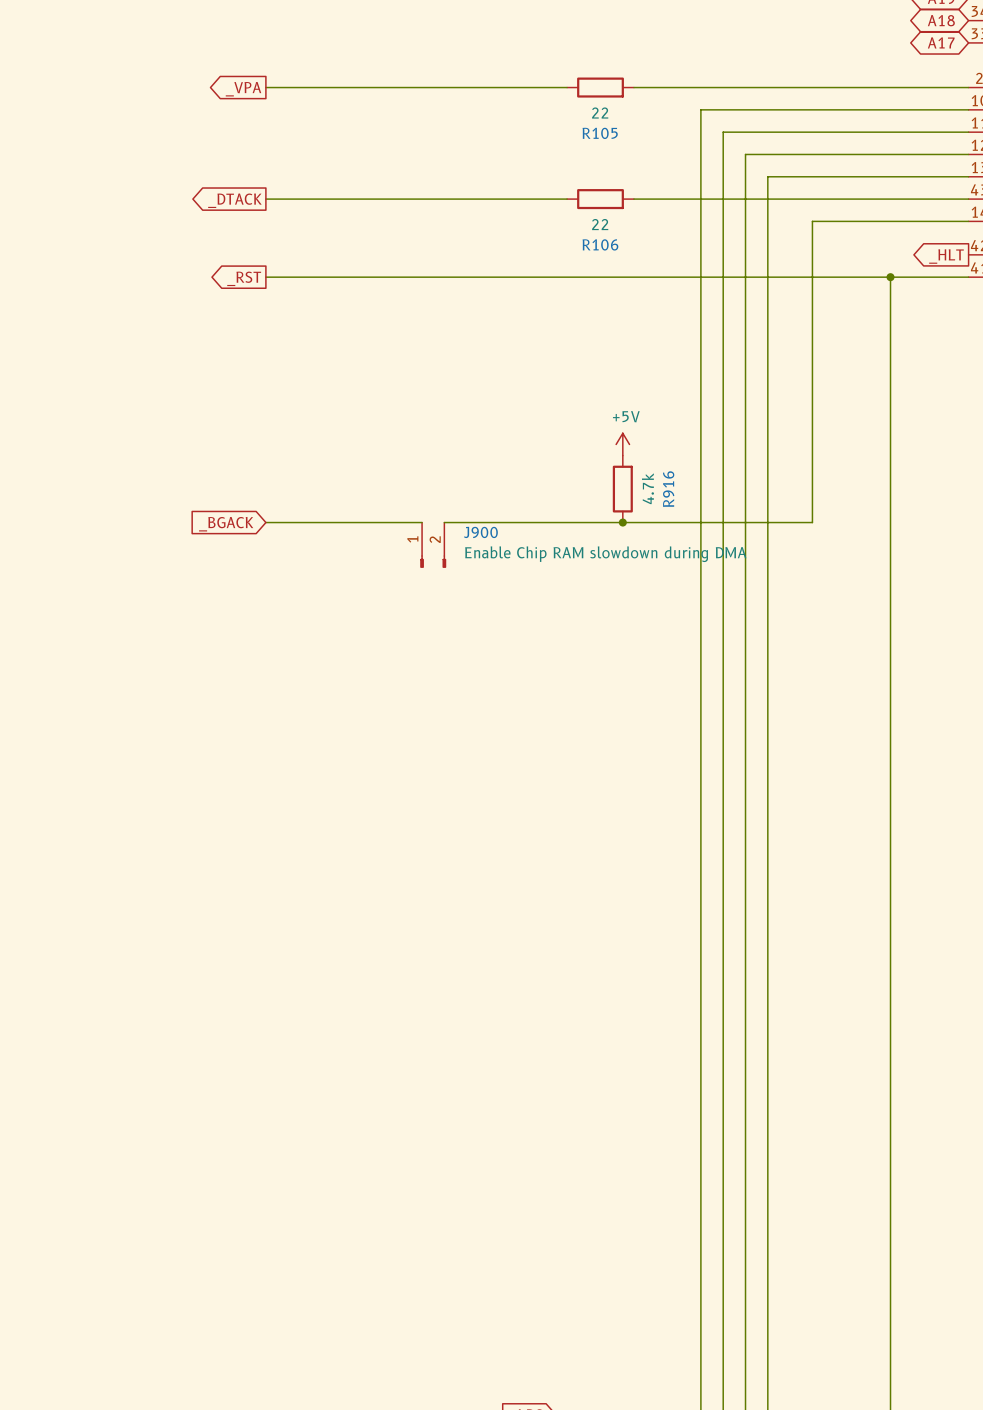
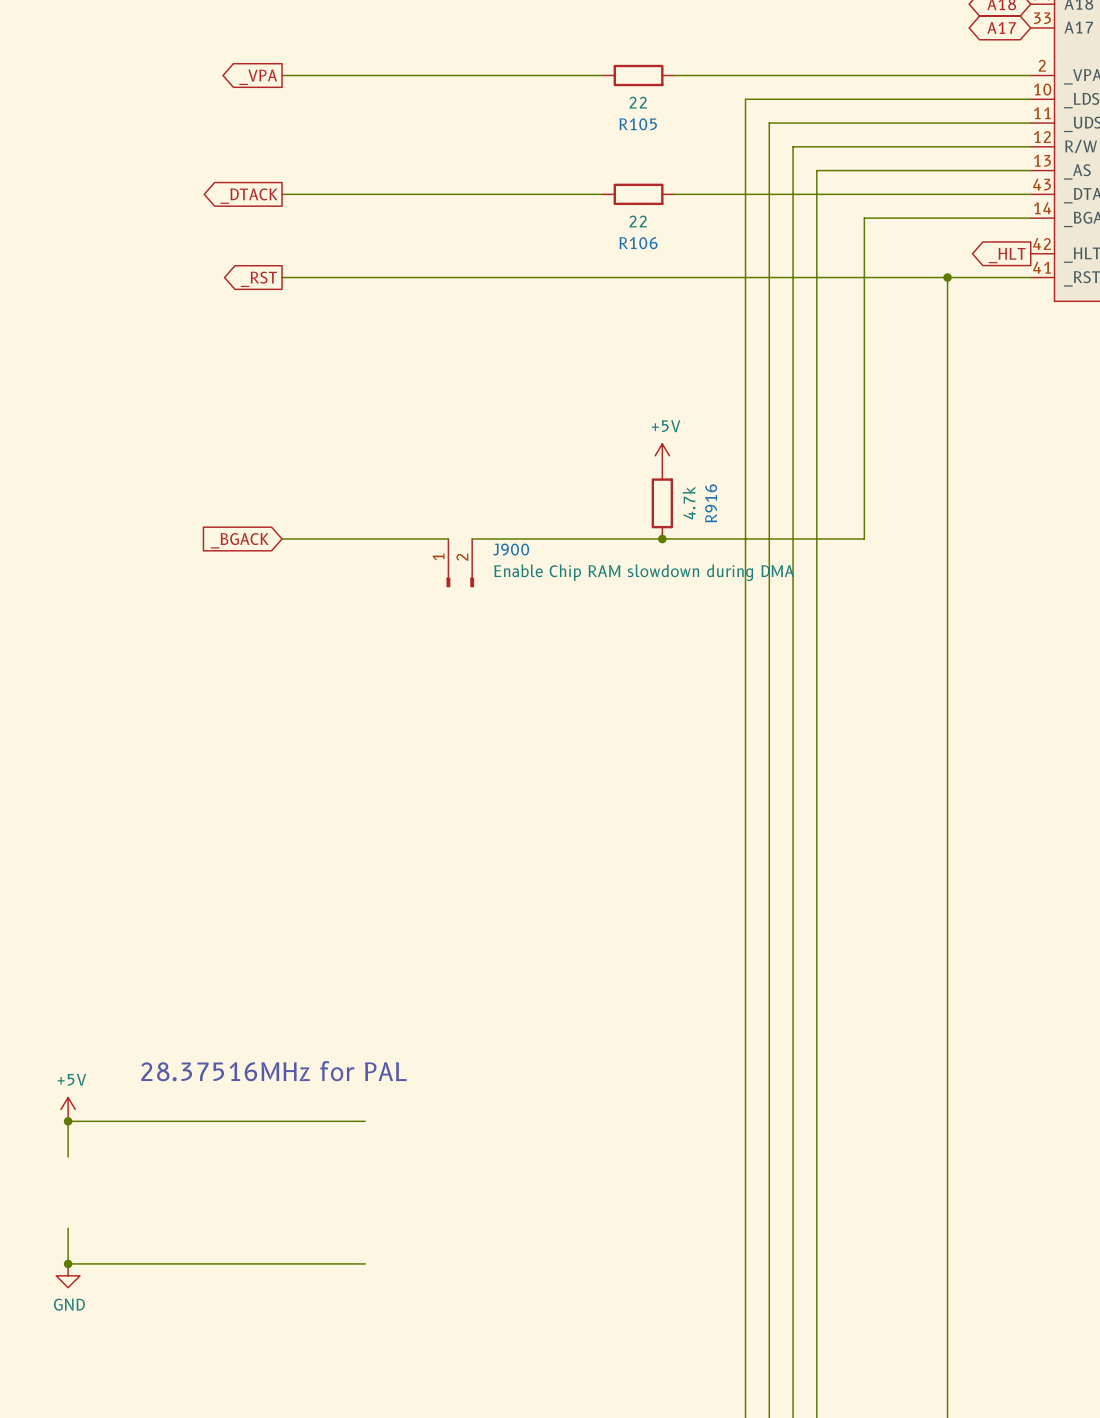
text: none -> 28.37516MHz for PAL (274, 1071)
power symbol: none -> +5V (68, 1109)
junction: none -> (68, 1121)
wire: none -> (365, 1121) (68, 1121) (68, 1156)
wire: none -> (68, 1228) (68, 1263) (365, 1263)
junction: none -> (68, 1263)
power symbol: none -> GND (68, 1275)

